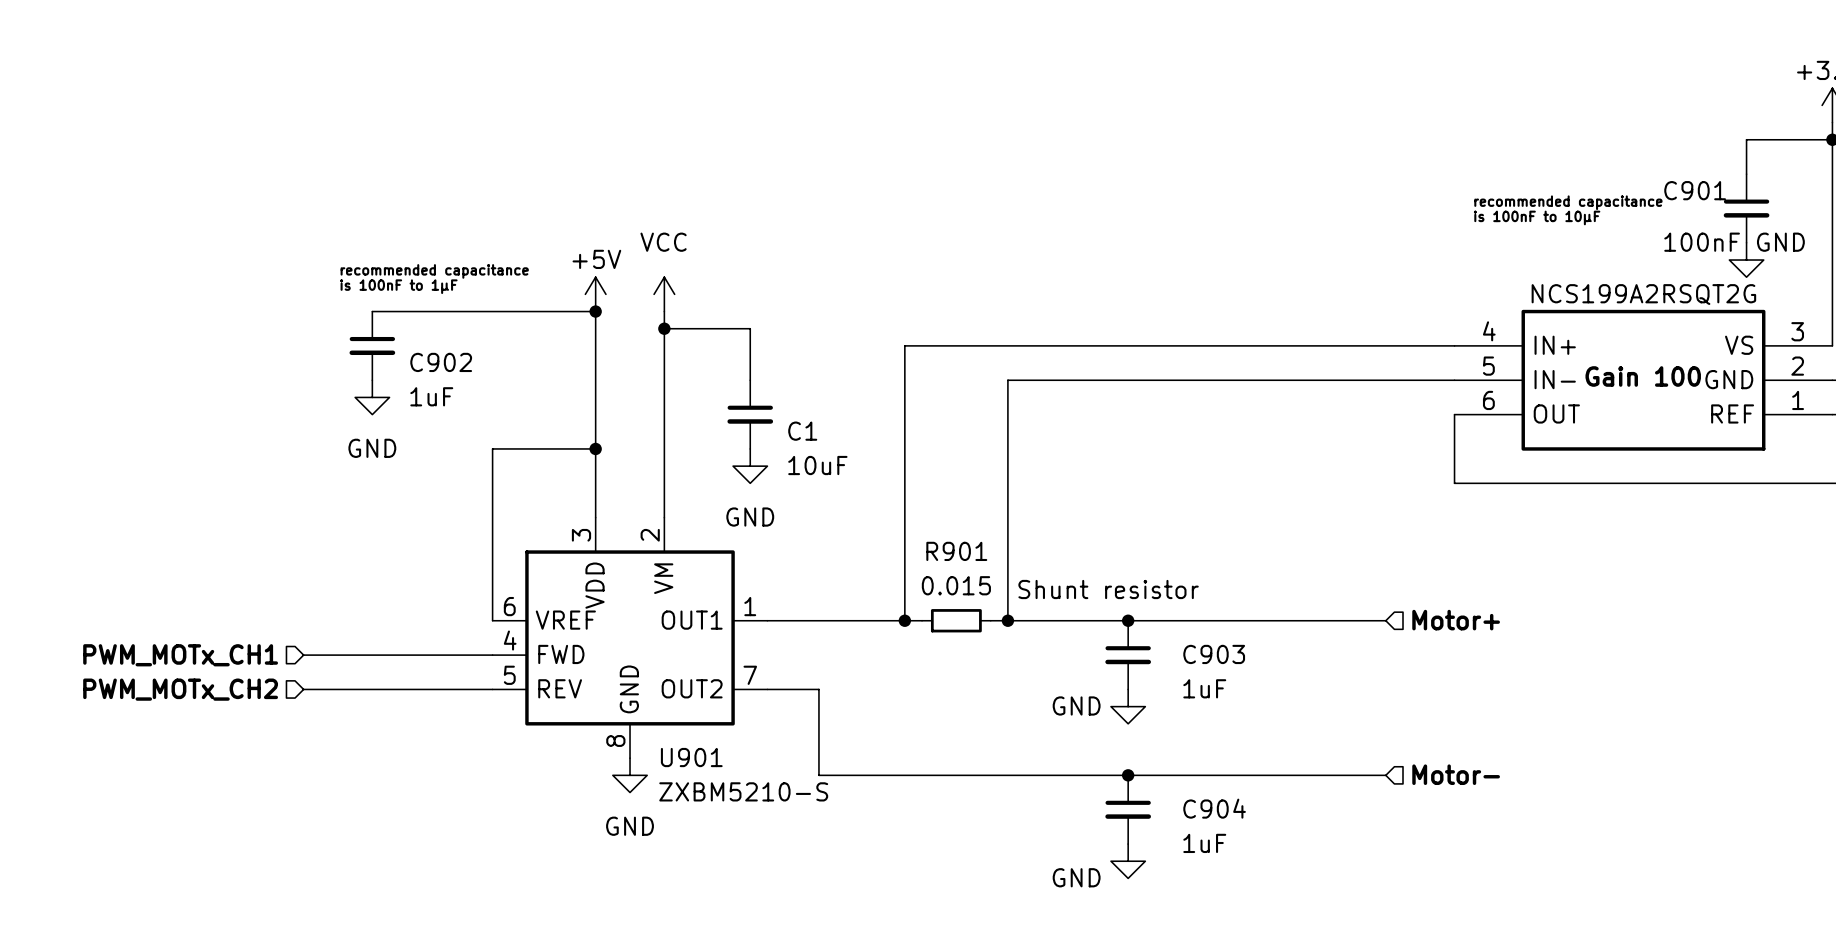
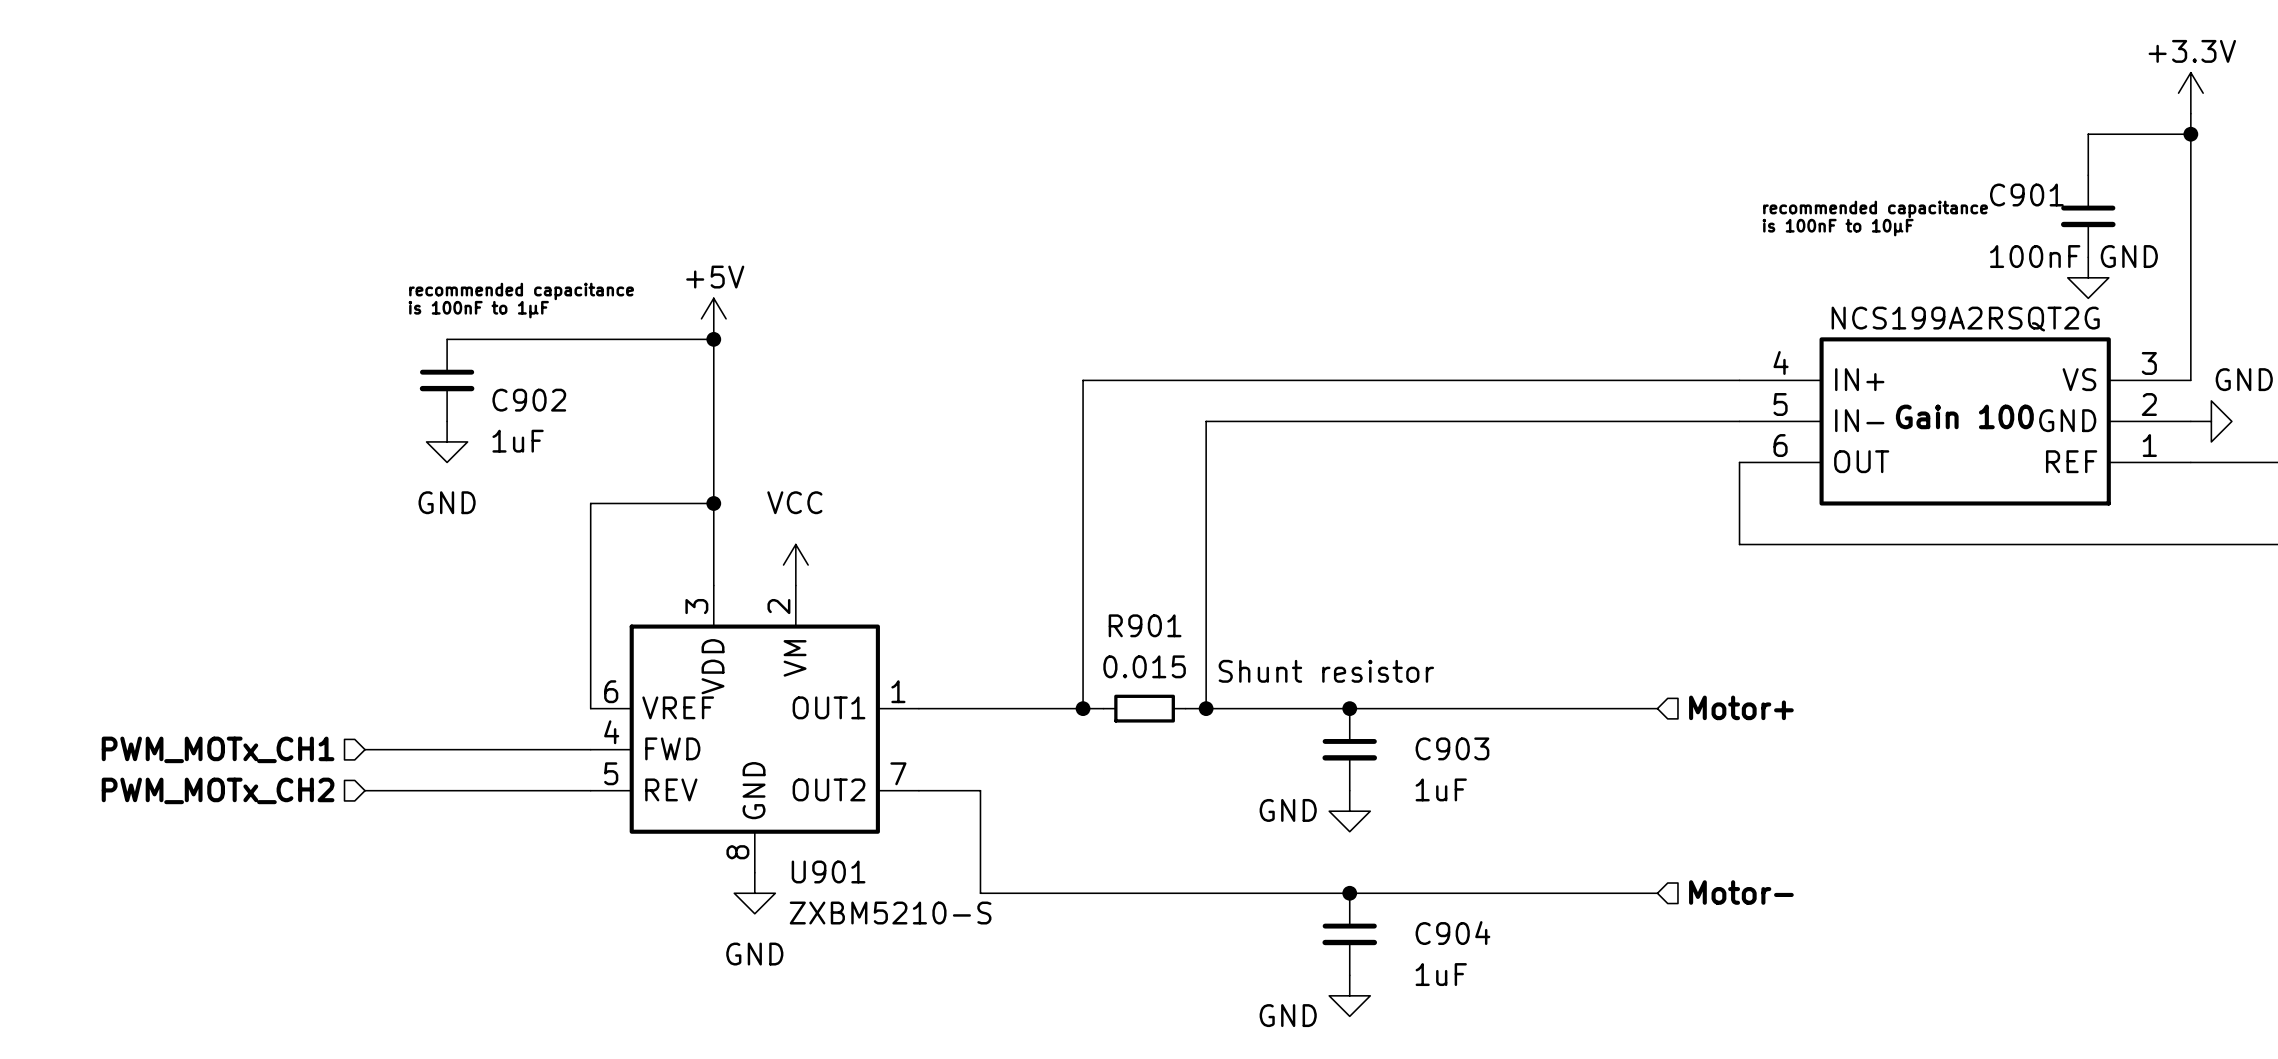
power symbol position: VCC (664, 294) -> VCC (795, 565)
wire: (664, 311) (664, 517) -> none
wire: (664, 328) (750, 328) (750, 380) -> none
junction: (664, 328) -> none
C1: 10uF (750, 414) -> none
power symbol: GND (750, 466) -> none

